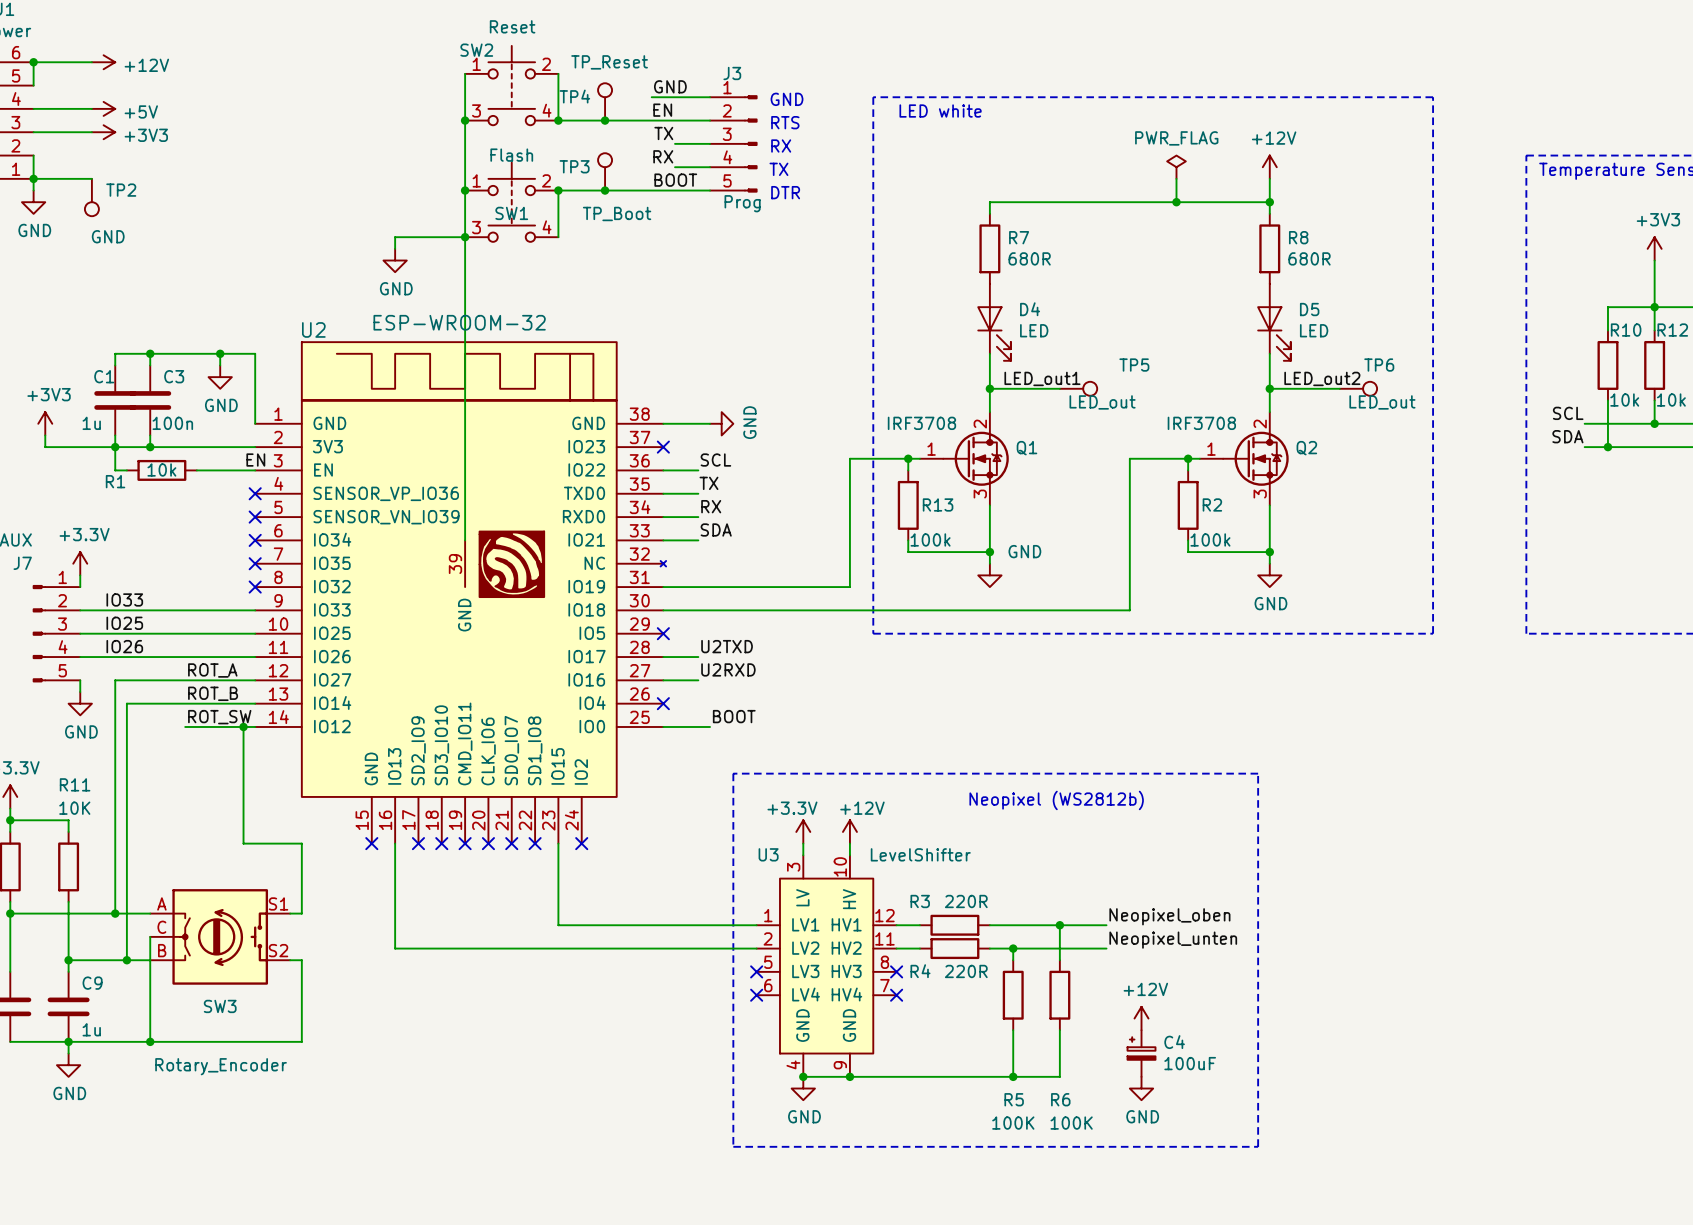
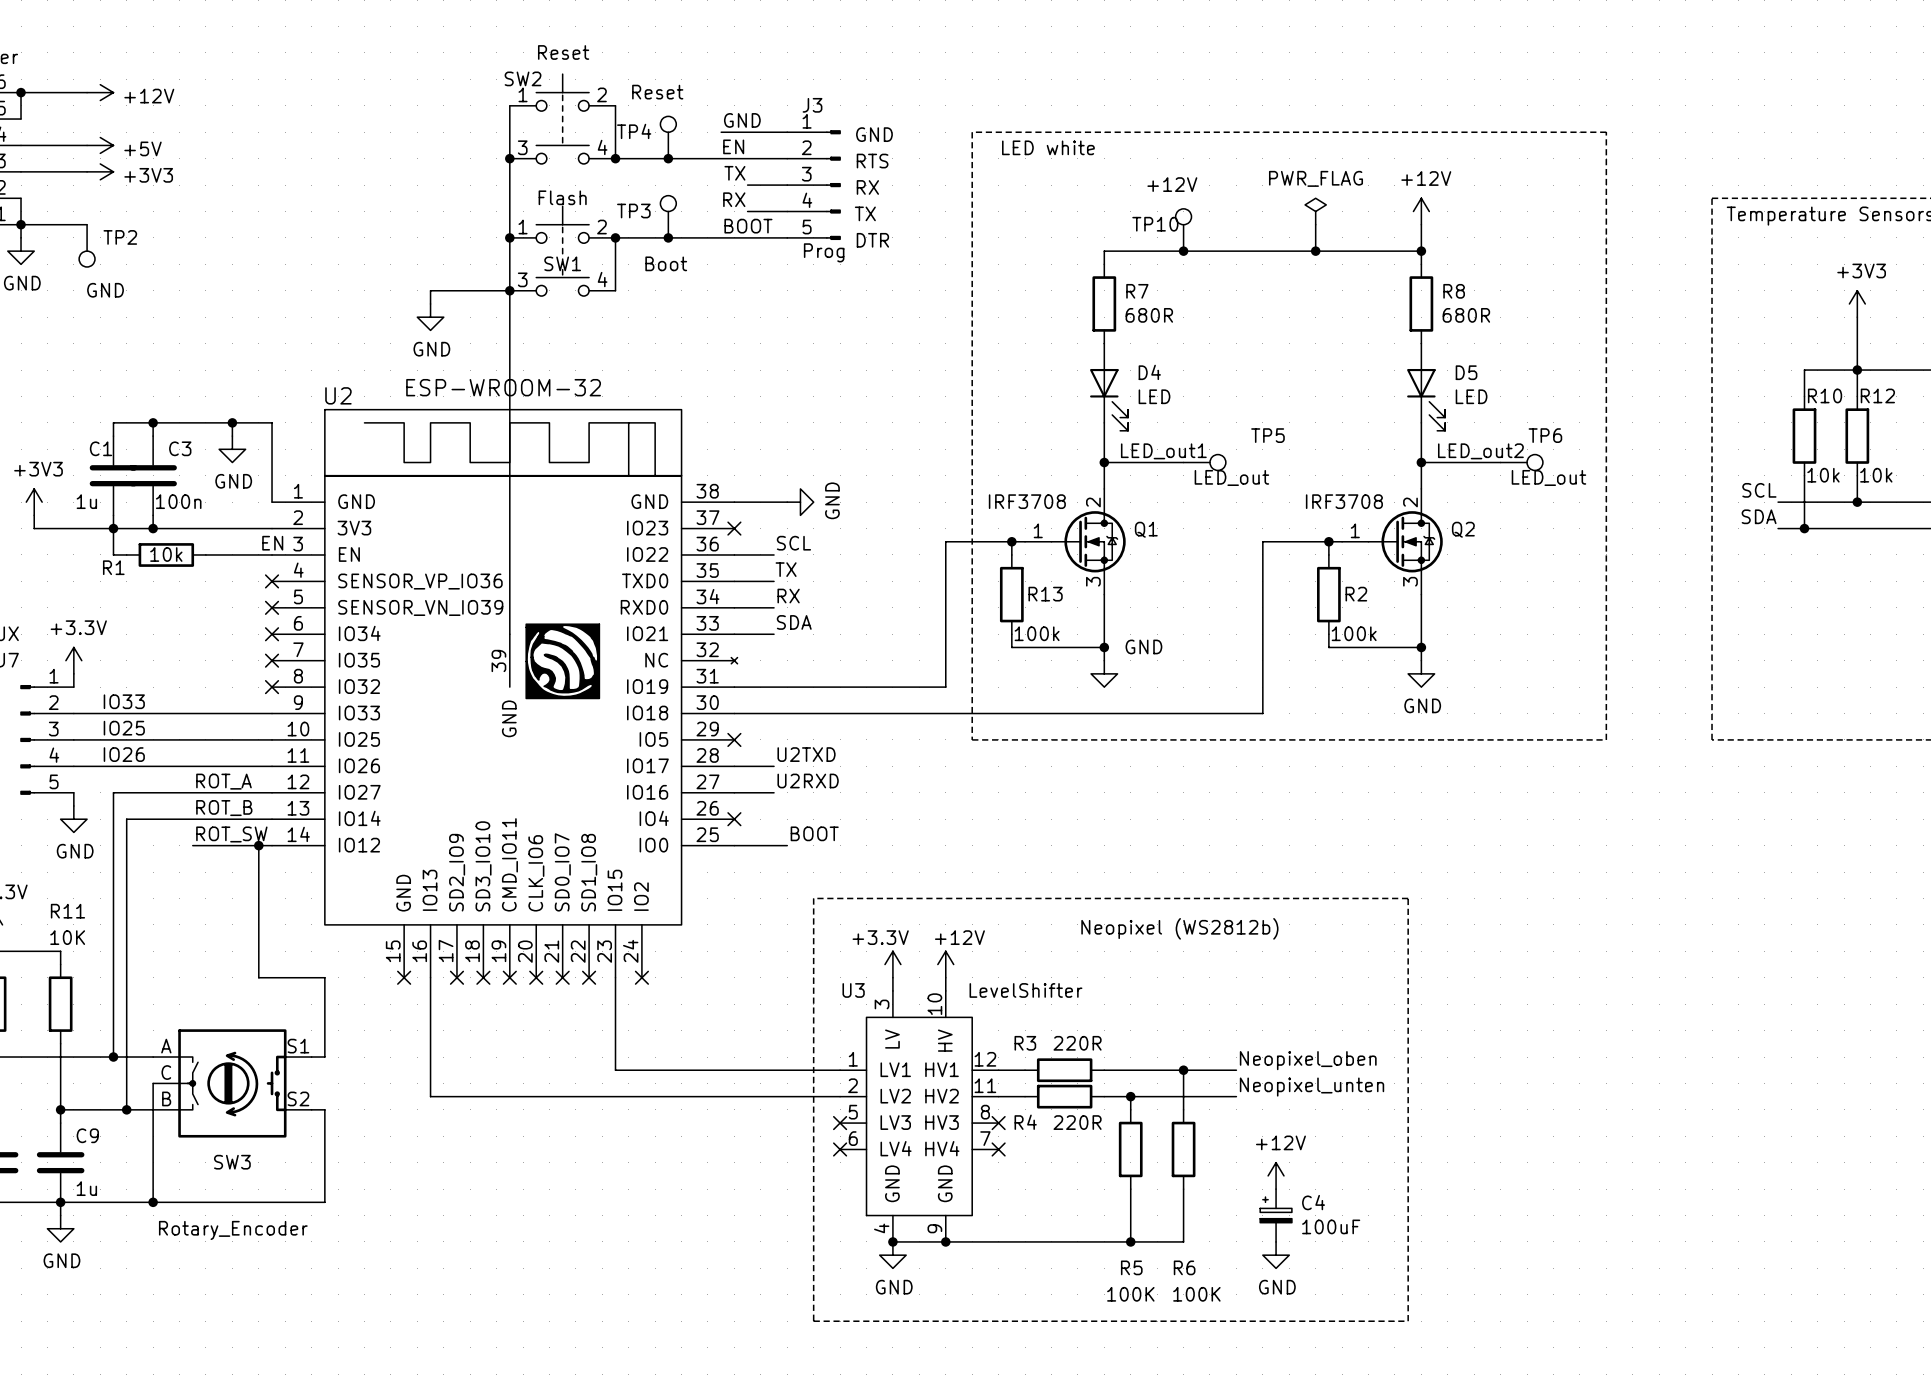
TP4 value: TP_Reset (609, 62) -> Reset (657, 92)
TP10: none -> +12V (1183, 230)
junction: none -> (1183, 251)
TP3 value: TP_Boot (617, 213) -> Boot (666, 263)

